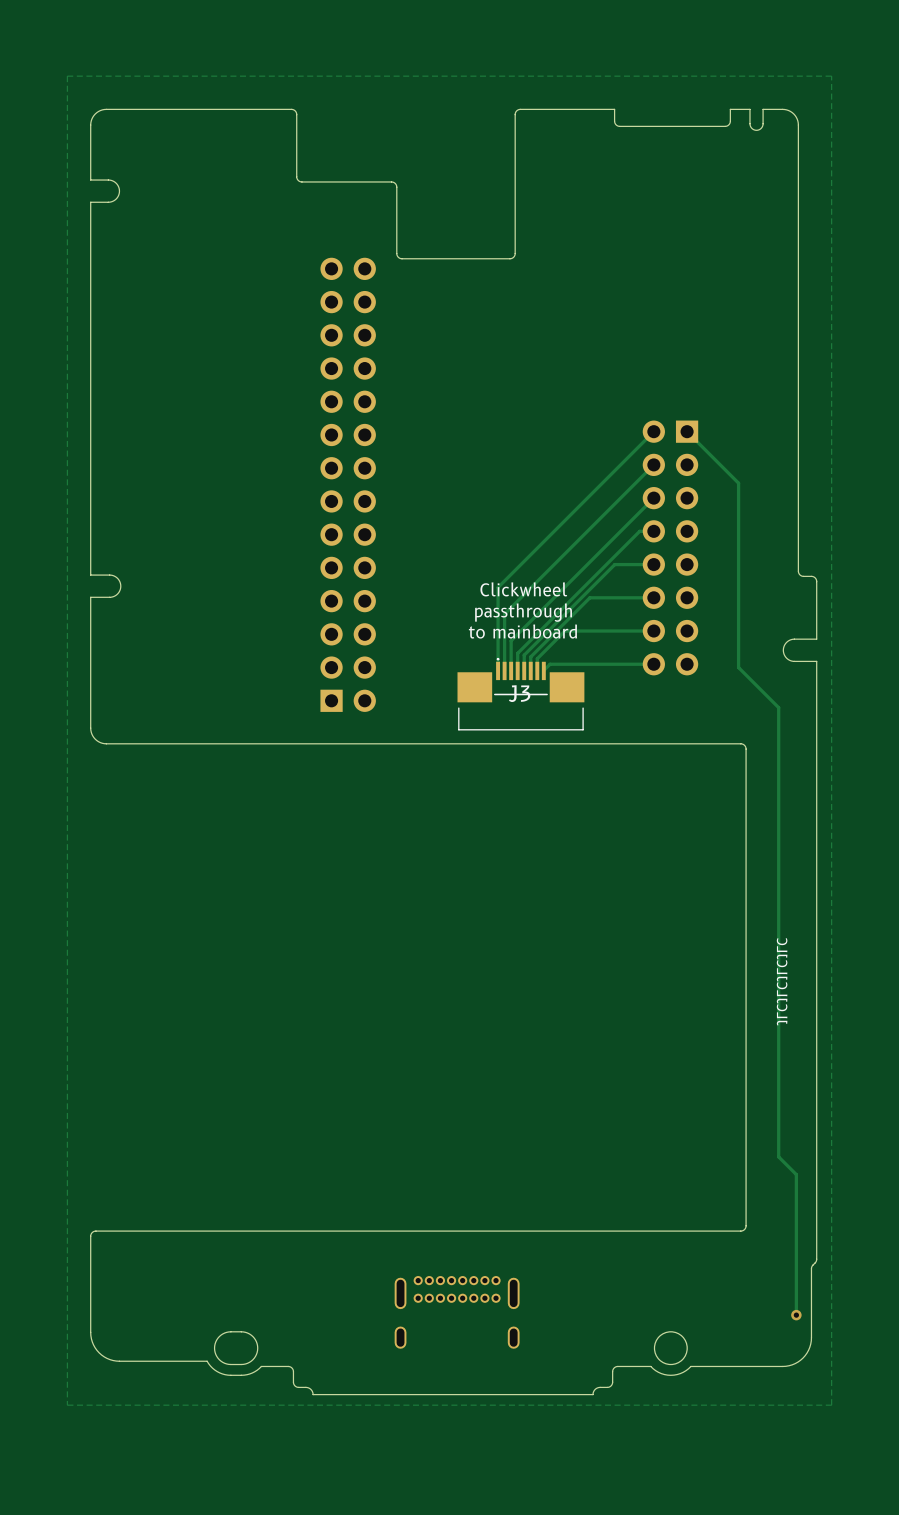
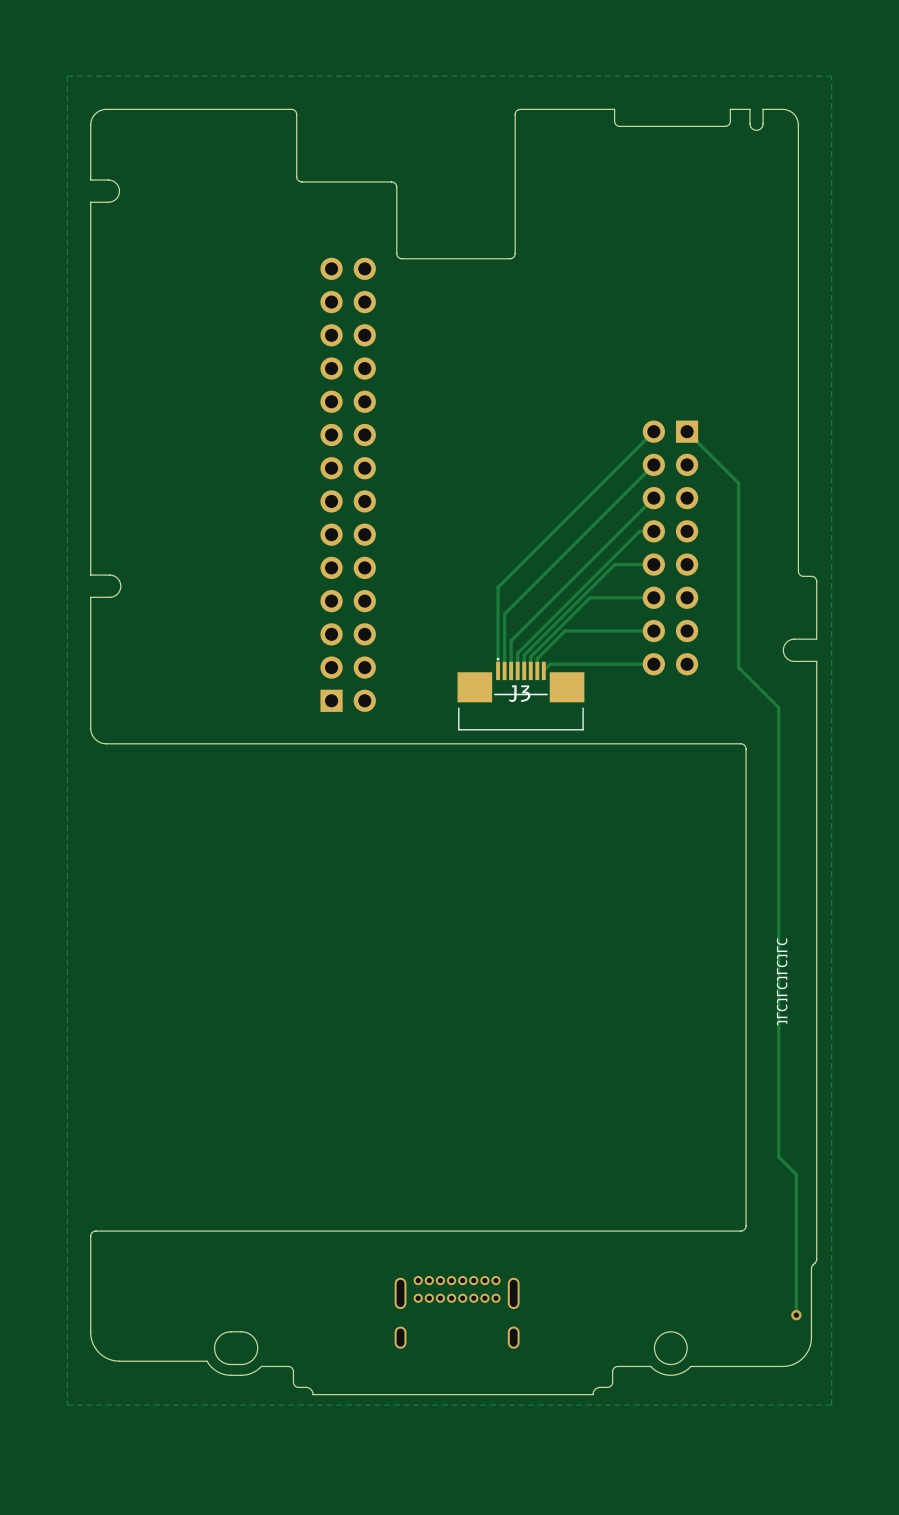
text: Clickwheel (523, 589) -> none
text: passthrough (523, 612) -> none
text: to mainboard (522, 631) -> none

